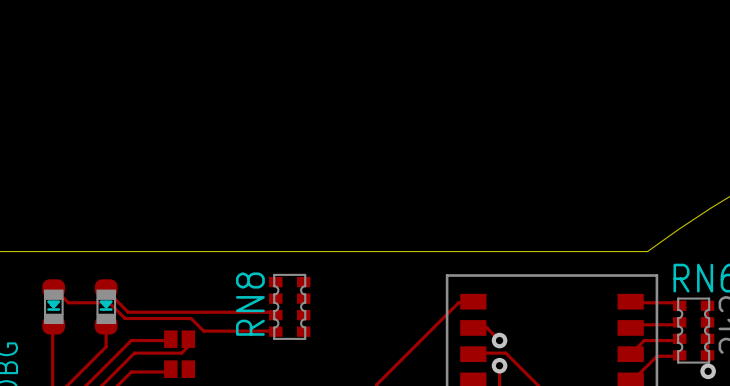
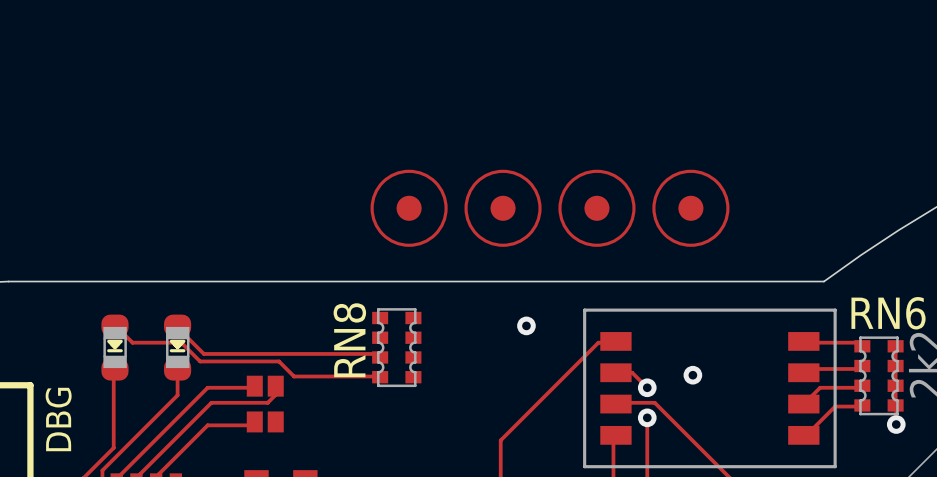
part: none -> (409, 208)
part: none -> (503, 208)
part: none -> (596, 208)
part: none -> (690, 208)
via: none -> (526, 325)
via: none -> (692, 375)

